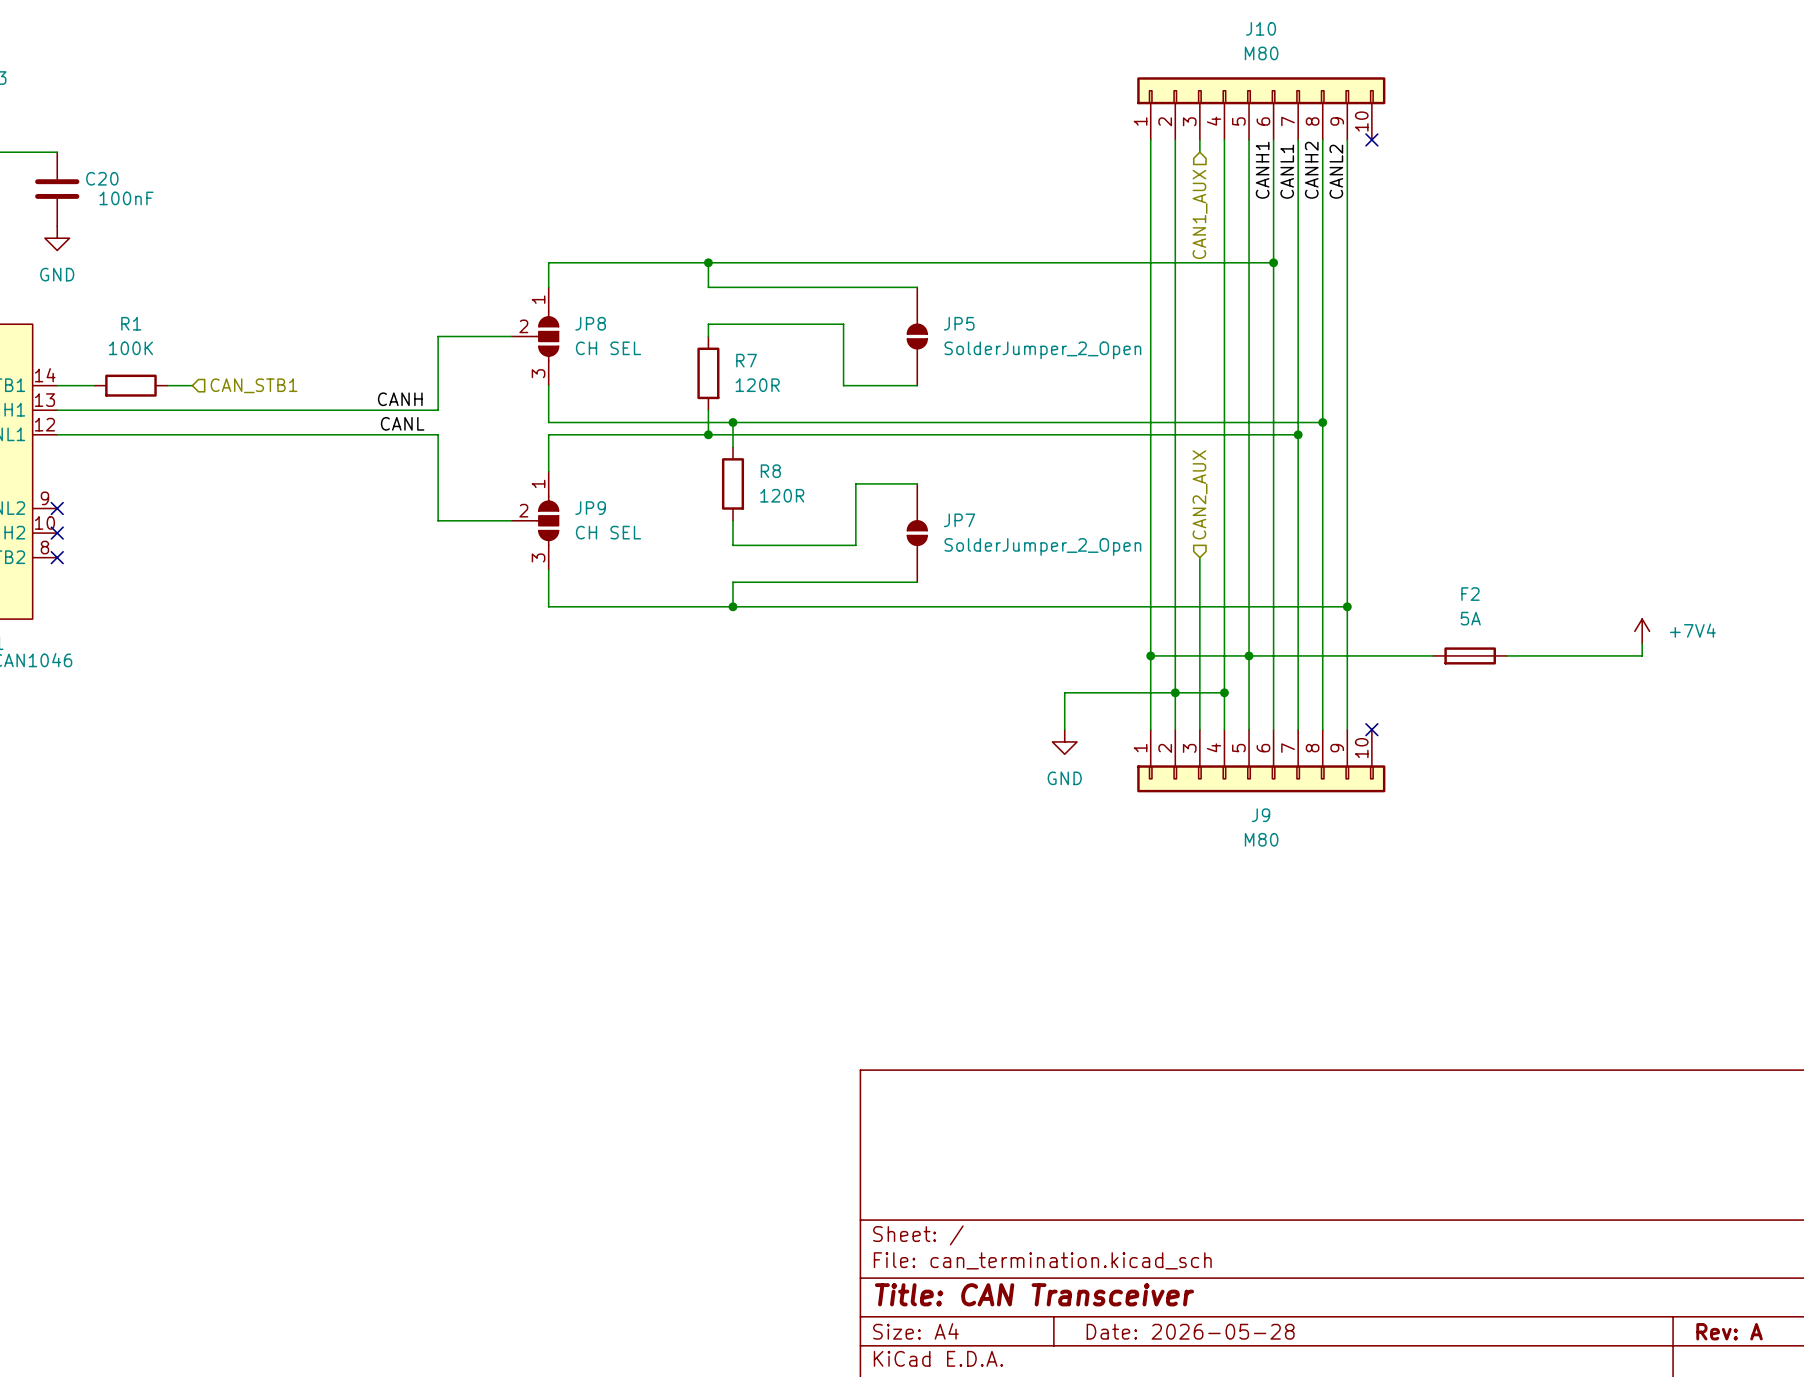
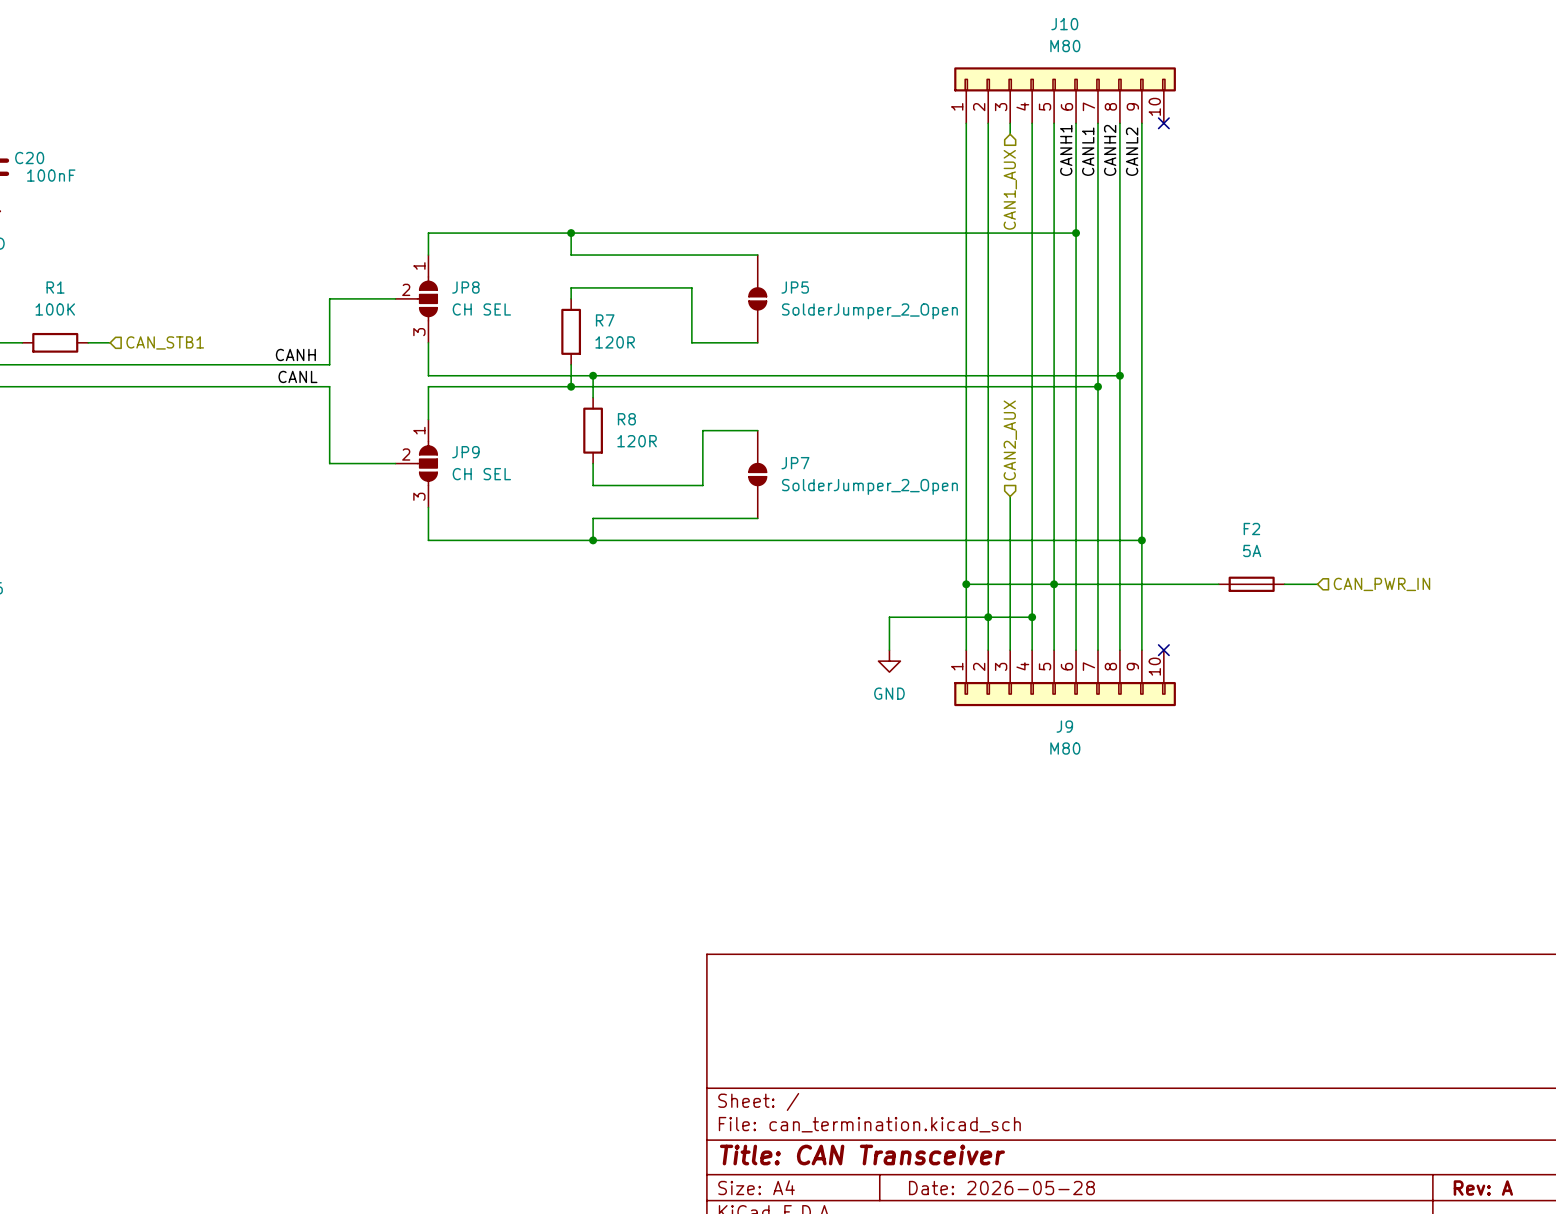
power symbol: +7V4 (1642, 631) -> none
wire: (1642, 643) (1642, 655) (1543, 655) -> none
hierarchical label: none -> CAN_PWR_IN (1381, 584)

